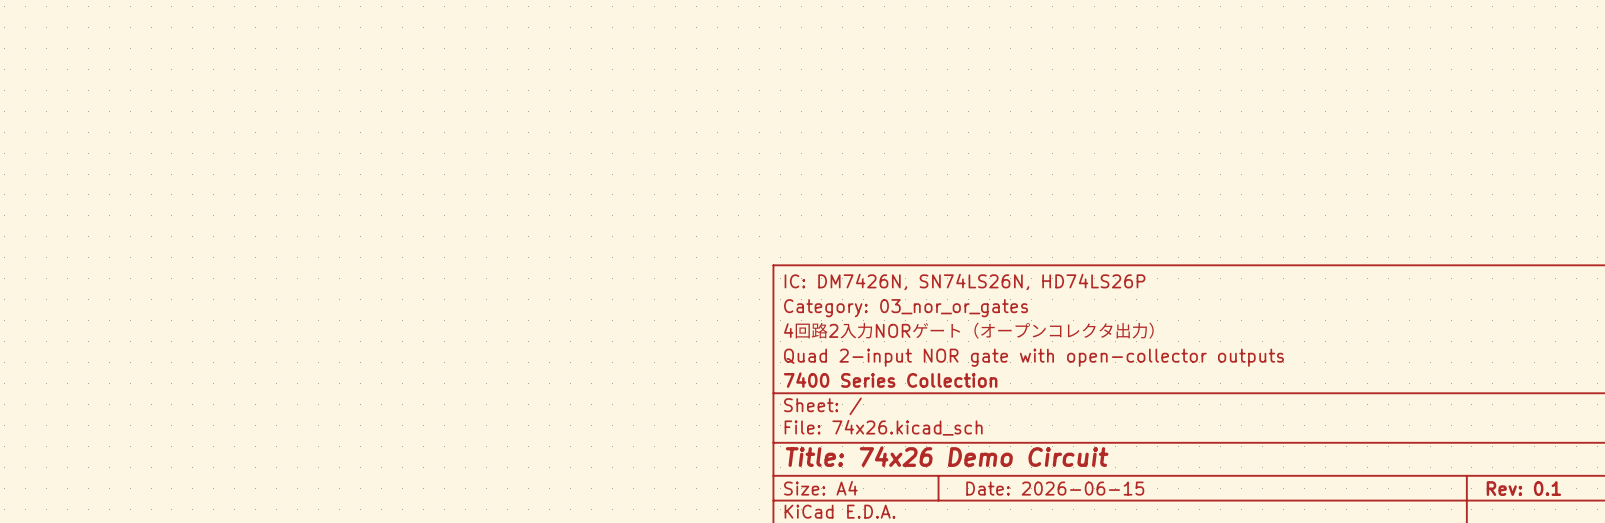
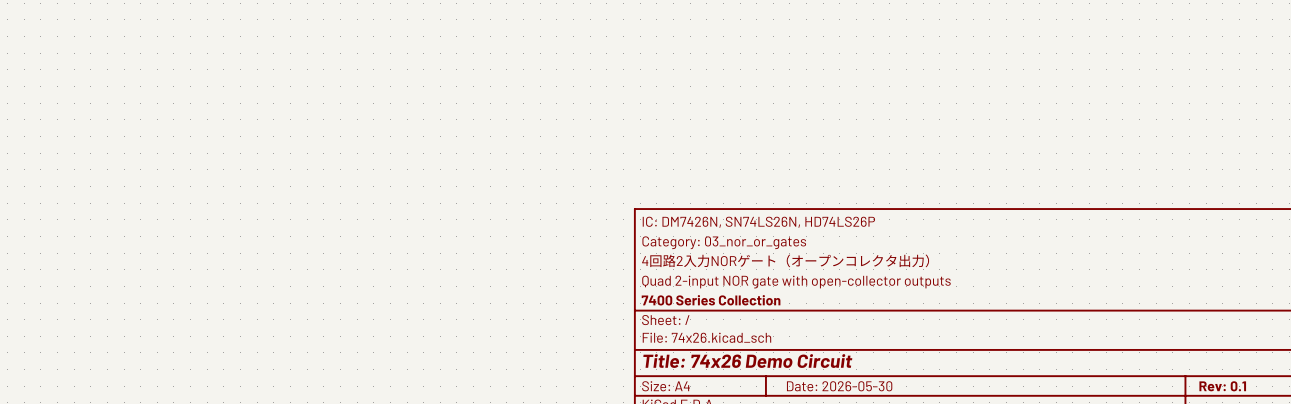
title block: Date: 2026-06-15 (1055, 488) -> Date: 2026-05-30 (839, 386)

